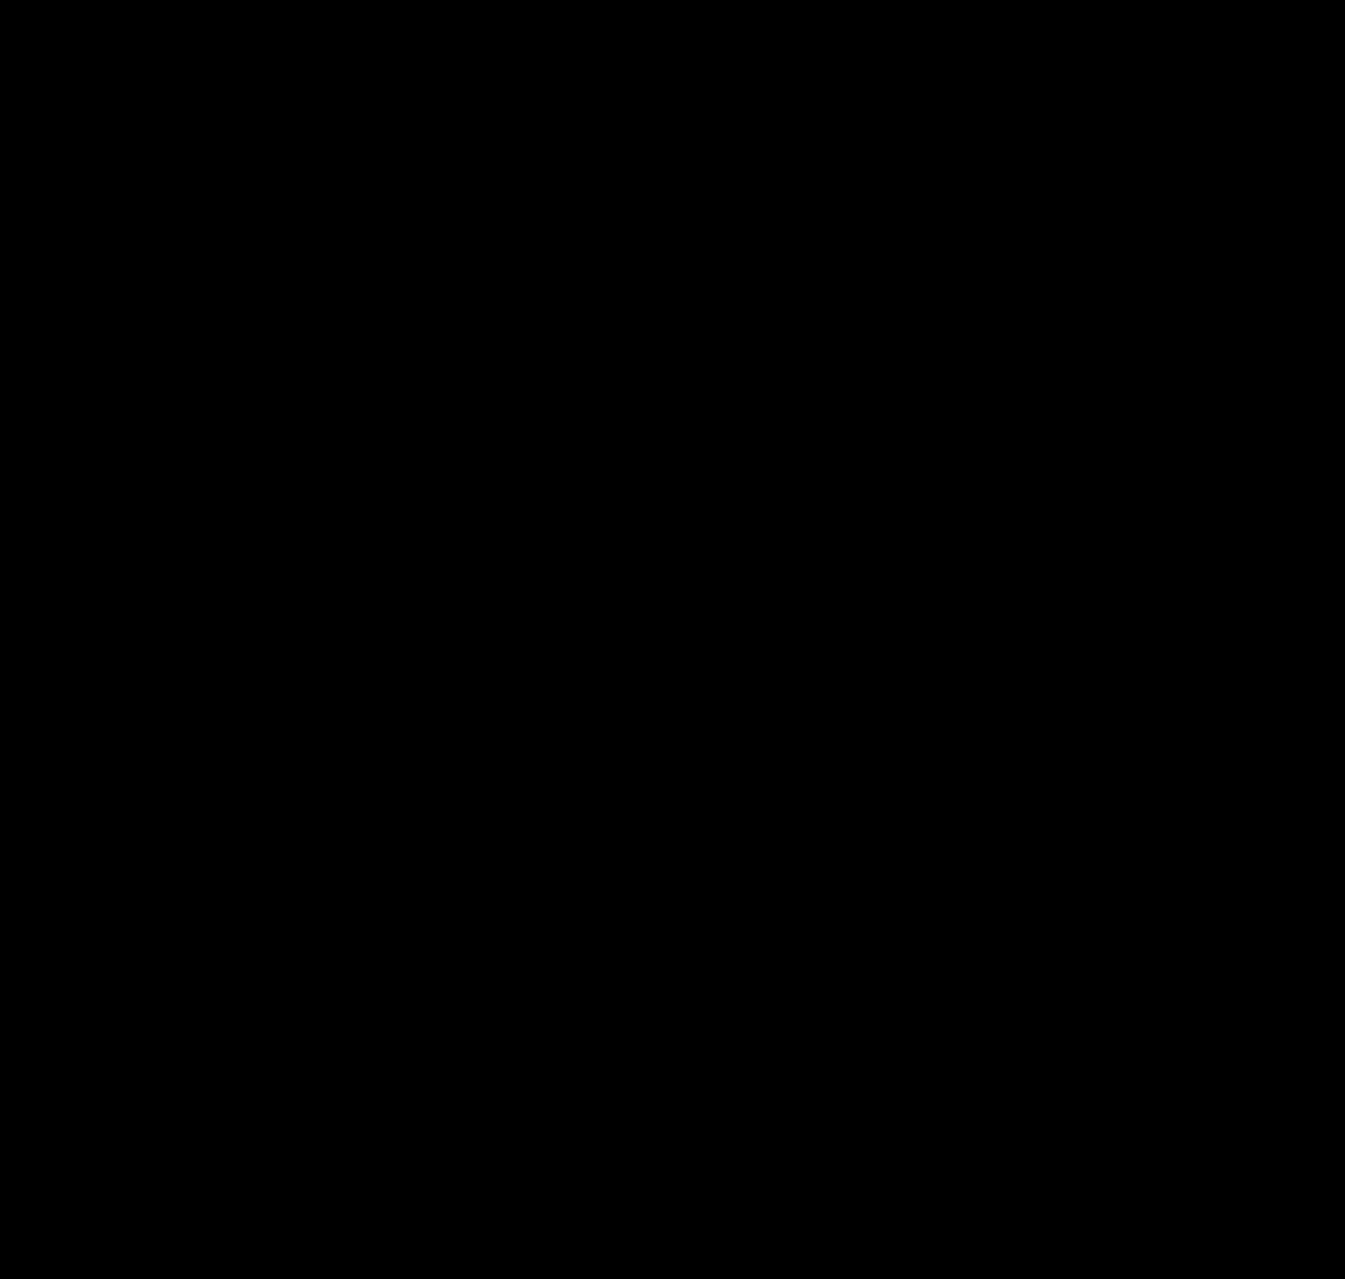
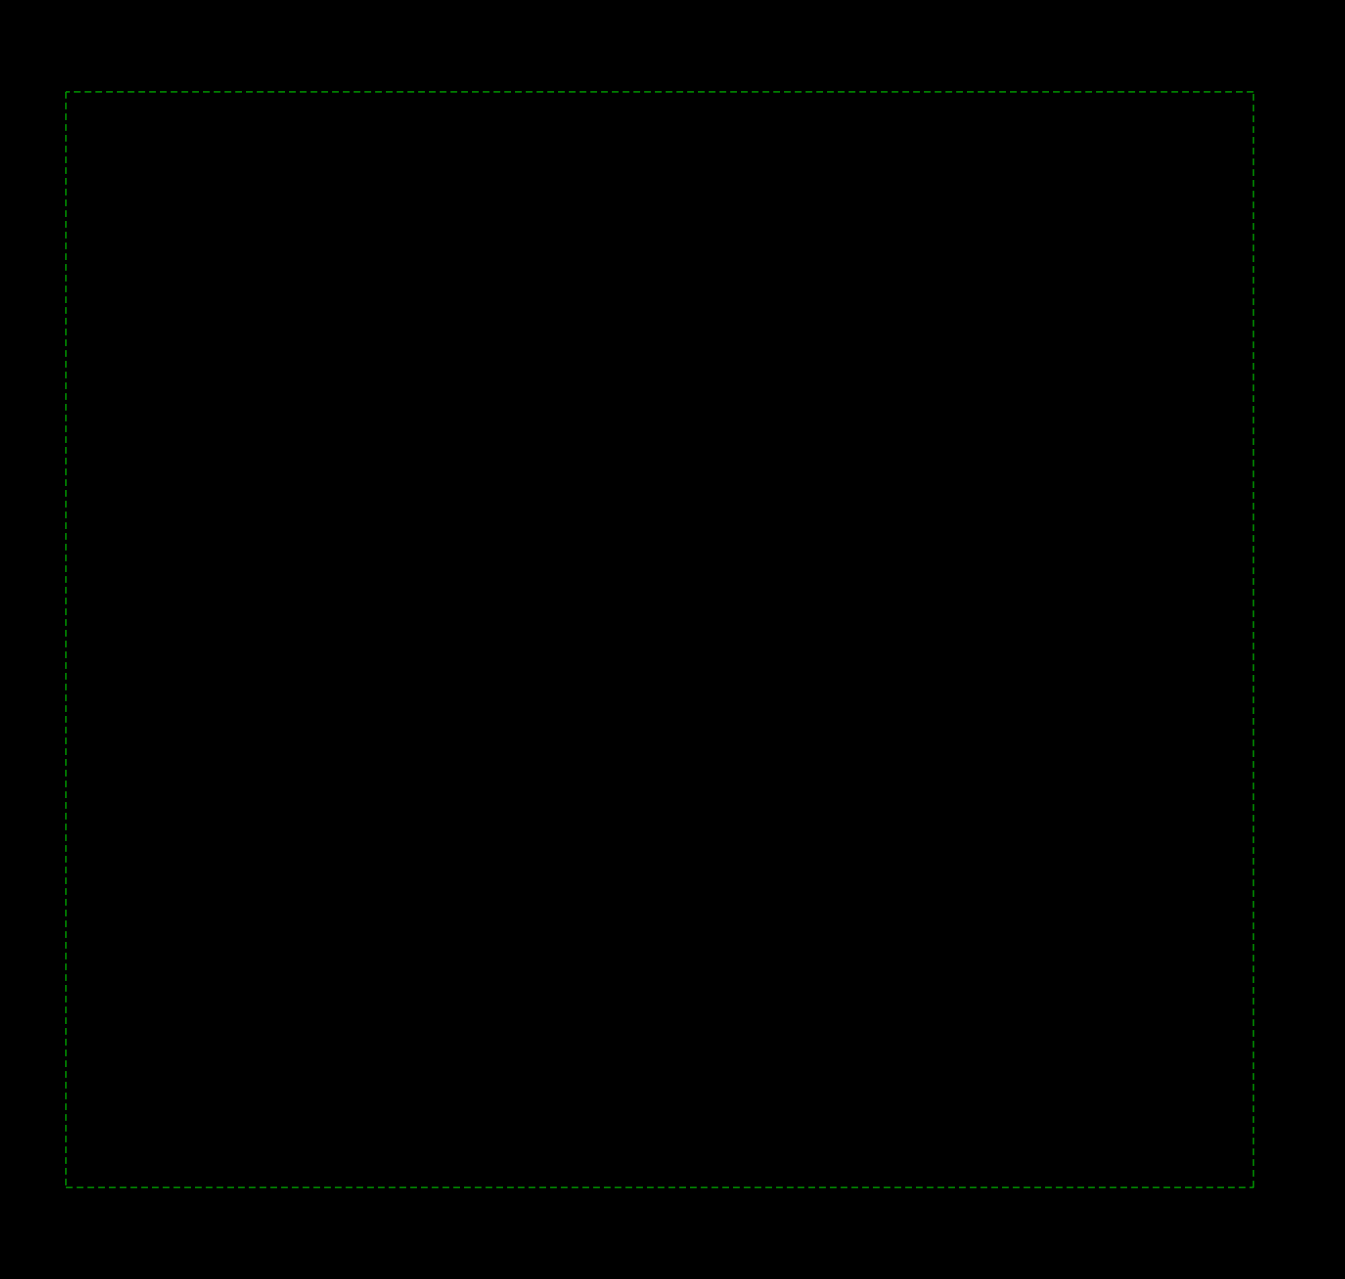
bottom zone outline: none -> (1253, 91) (65, 91) (65, 1187) (1253, 1187) (1253, 91)

